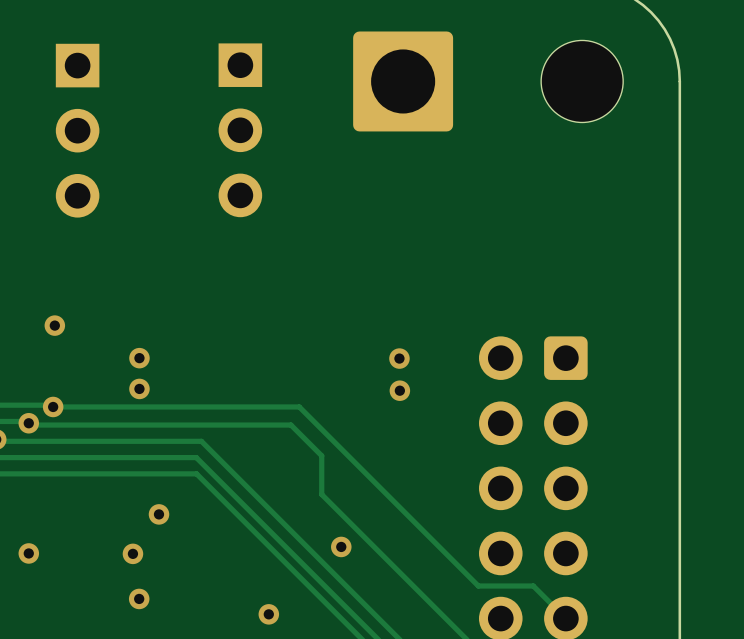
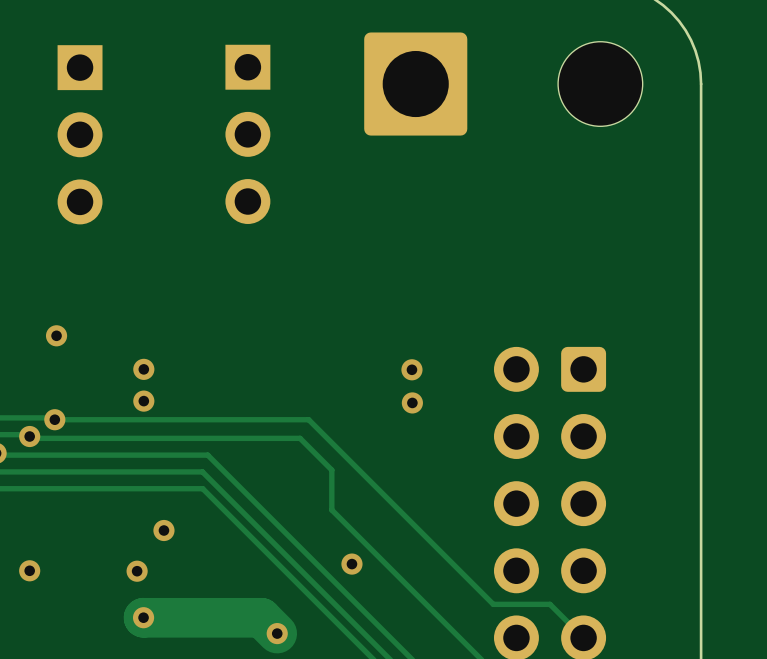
track: none -> (143, 617) (261, 617) (277, 633)

